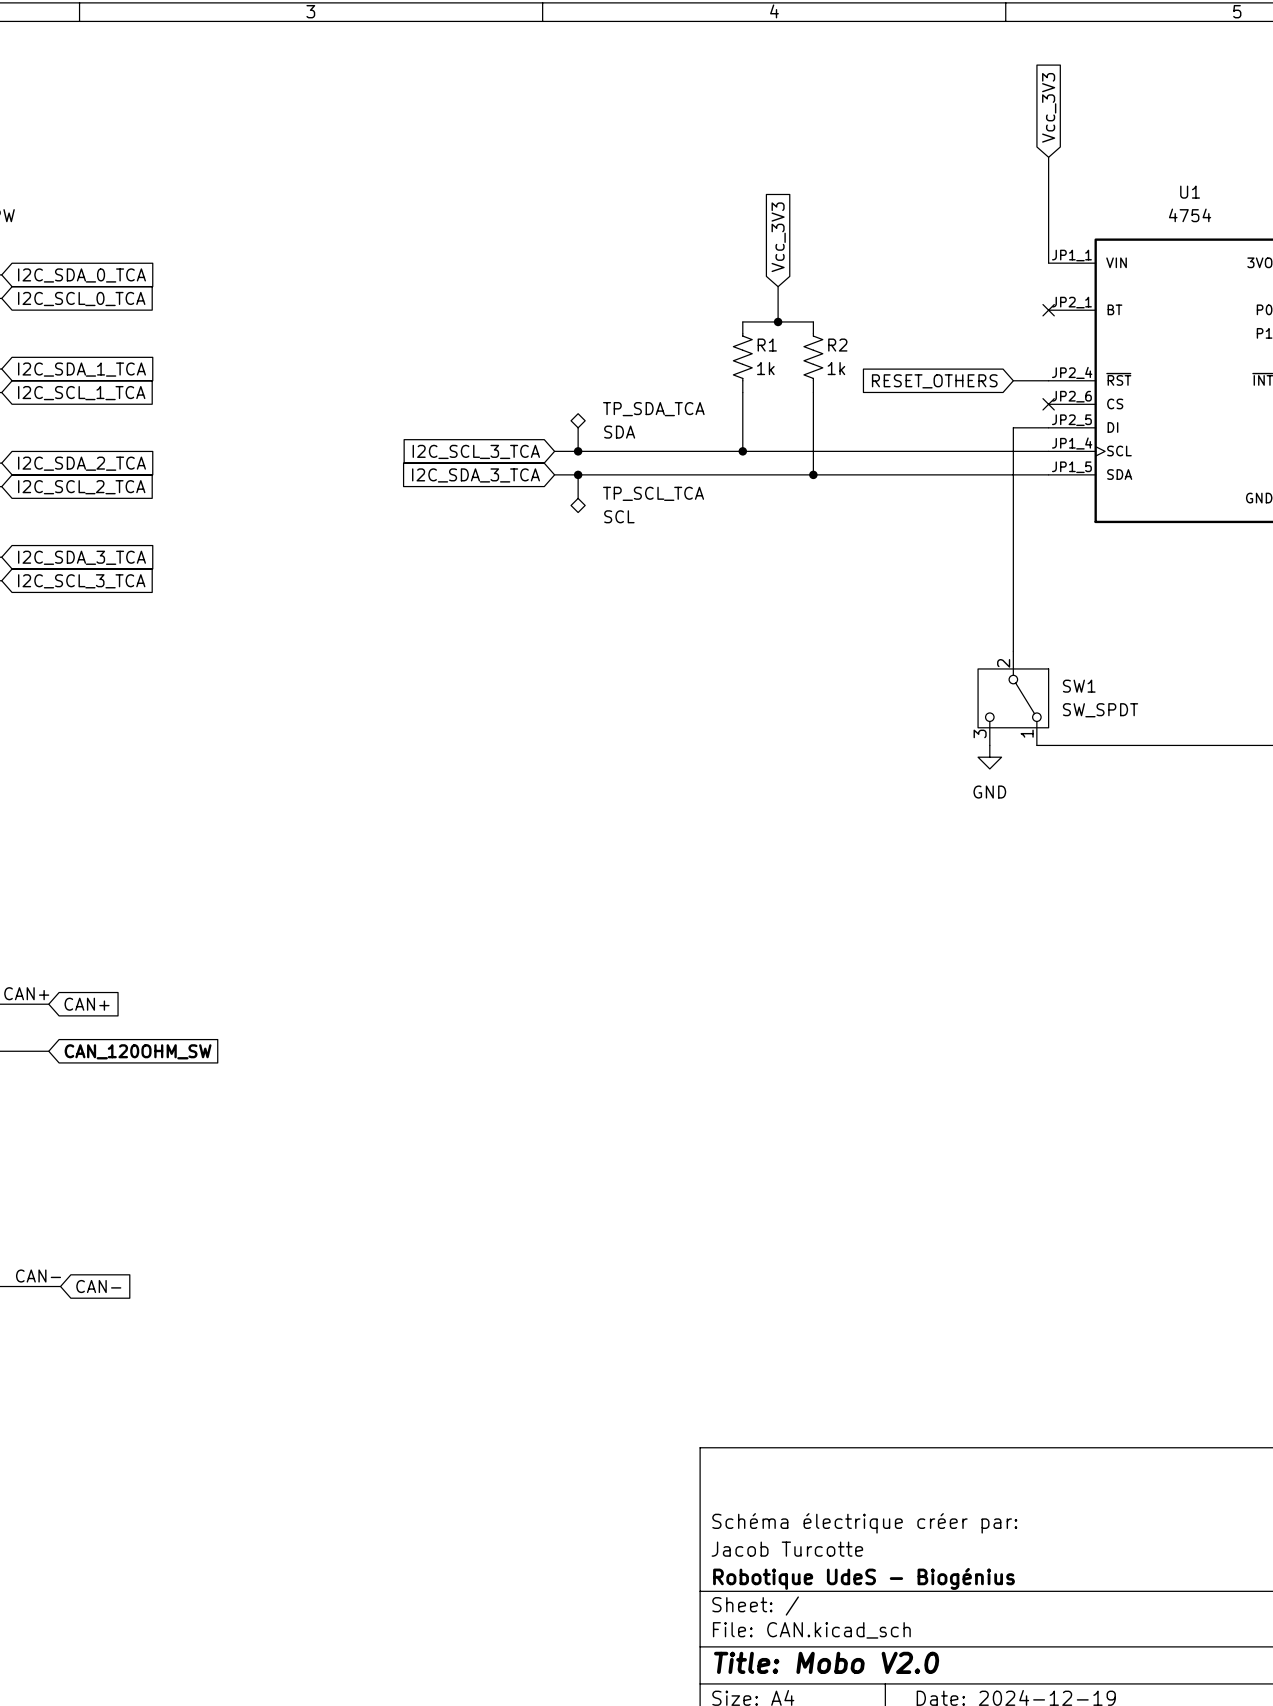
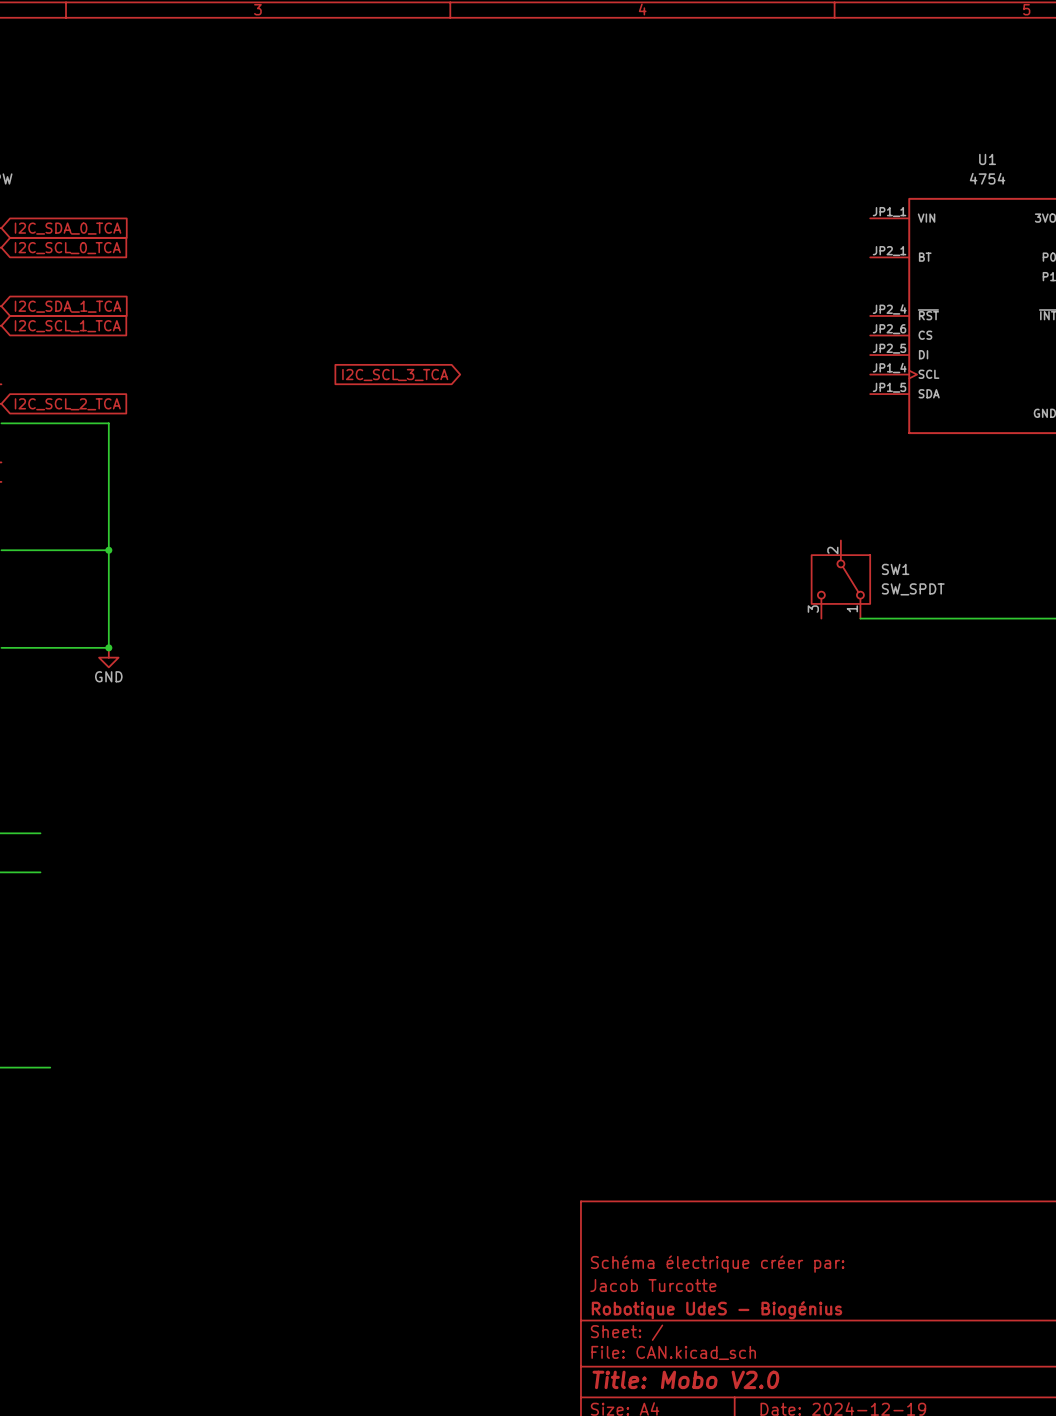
global label: Vcc_3V3 (1049, 107) -> none
wire: (1048, 157) (1048, 263) -> none
global label: Vcc_3V3 (778, 237) -> none
wire: (778, 286) (778, 321) -> none
no-connect mark: (1048, 310) -> none
wire: (742, 321) (813, 321) -> none
junction: (778, 321) -> none
R1: 1k (742, 357) -> none
R2: 1k (813, 357) -> none
wire: (1013, 380) (1048, 380) -> none
global label: RESET_OTHERS (934, 381) -> none
wire: (742, 392) (742, 451) -> none
wire: (813, 392) (813, 474) -> none
no-connect mark: (1048, 404) -> none
wire: (1048, 427) (1013, 427) (1013, 651) -> none
TP_SDA_TCA: SDA (578, 432) -> none
wire: (554, 451) (1048, 451) -> none
junction: (578, 451) -> none
junction: (742, 451) -> none
global label: I2C_SDA_2_TCA (82, 463) -> none
wire: (554, 474) (1048, 474) -> none
junction: (578, 474) -> none
junction: (813, 474) -> none
global label: I2C_SDA_3_TCA (476, 475) -> none
TP_SCL_TCA: SCL (578, 493) -> none
wire: none -> (1, 423) (108, 423) (108, 647) (1, 647)
global label: I2C_SDA_3_TCA (82, 557) -> none
global label: I2C_SCL_3_TCA (81, 581) -> none
wire: none -> (1, 550) (108, 550)
junction: none -> (108, 550)
power symbol: GND (989, 757) -> none
junction: none -> (108, 647)
power symbol: none -> GND (108, 657)
label: CAN+ (26, 993) -> none
global label: CAN+ (87, 1004) -> none
global label: CAN_120OHM_SW (138, 1051) -> none
label: CAN- (38, 1276) -> none
global label: CAN- (98, 1286) -> none

